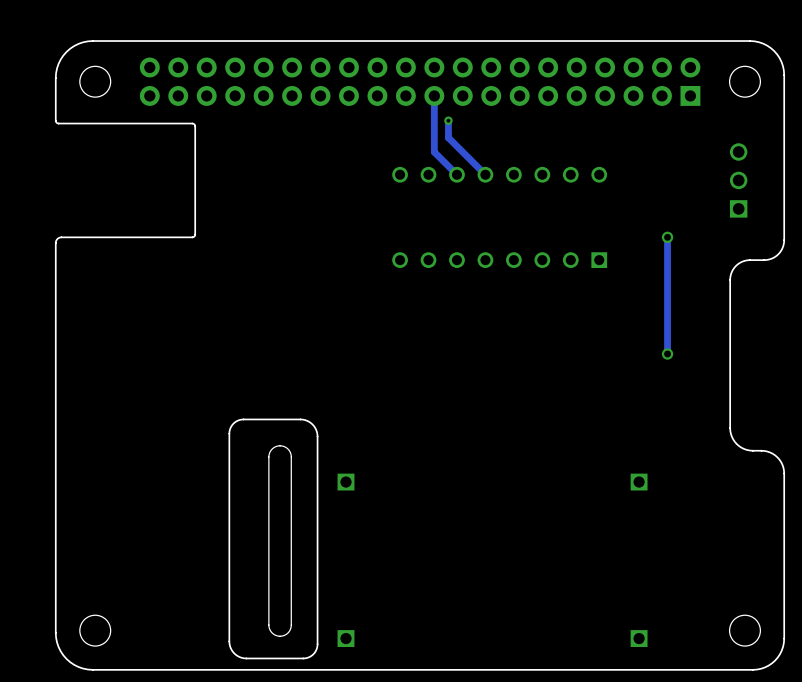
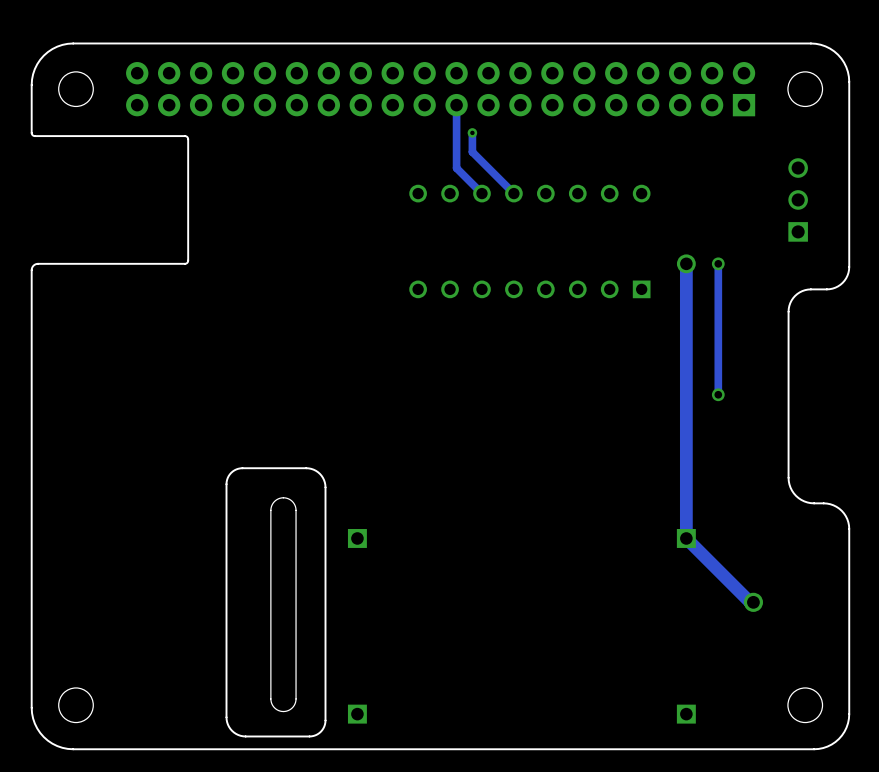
track: none -> (686, 263) (686, 538) (750, 602) (753, 602)
via: none -> (686, 263)
via: none -> (753, 602)

